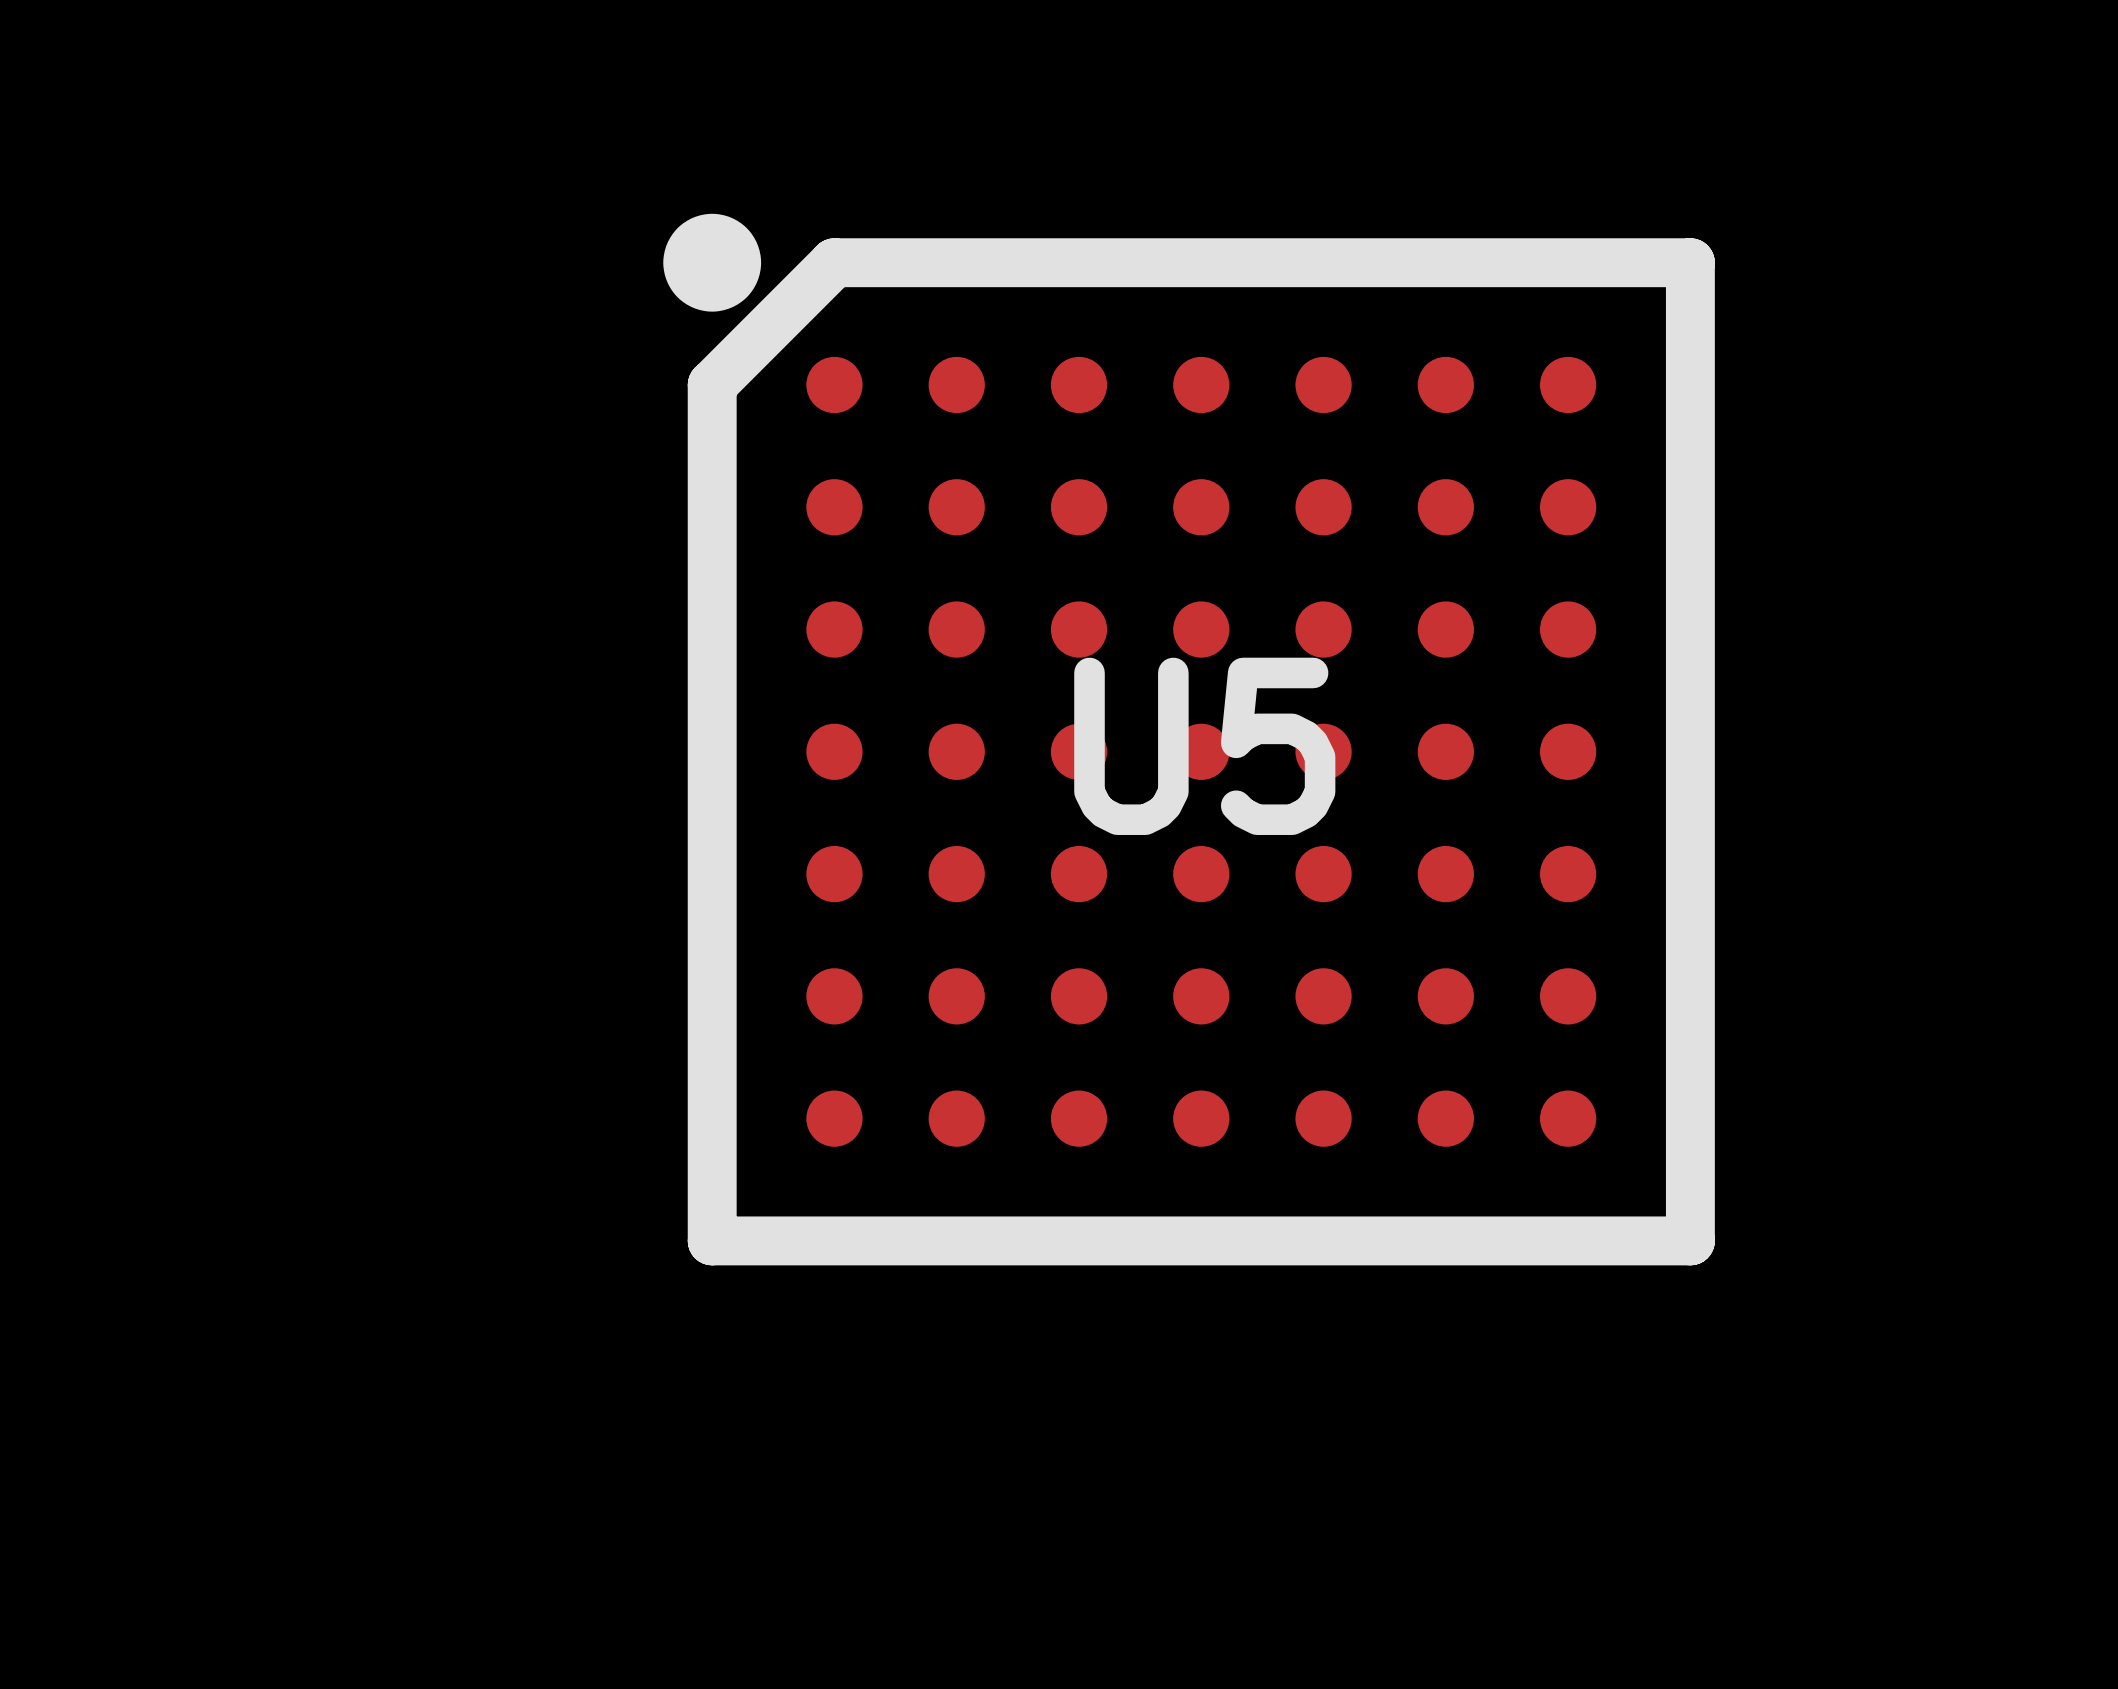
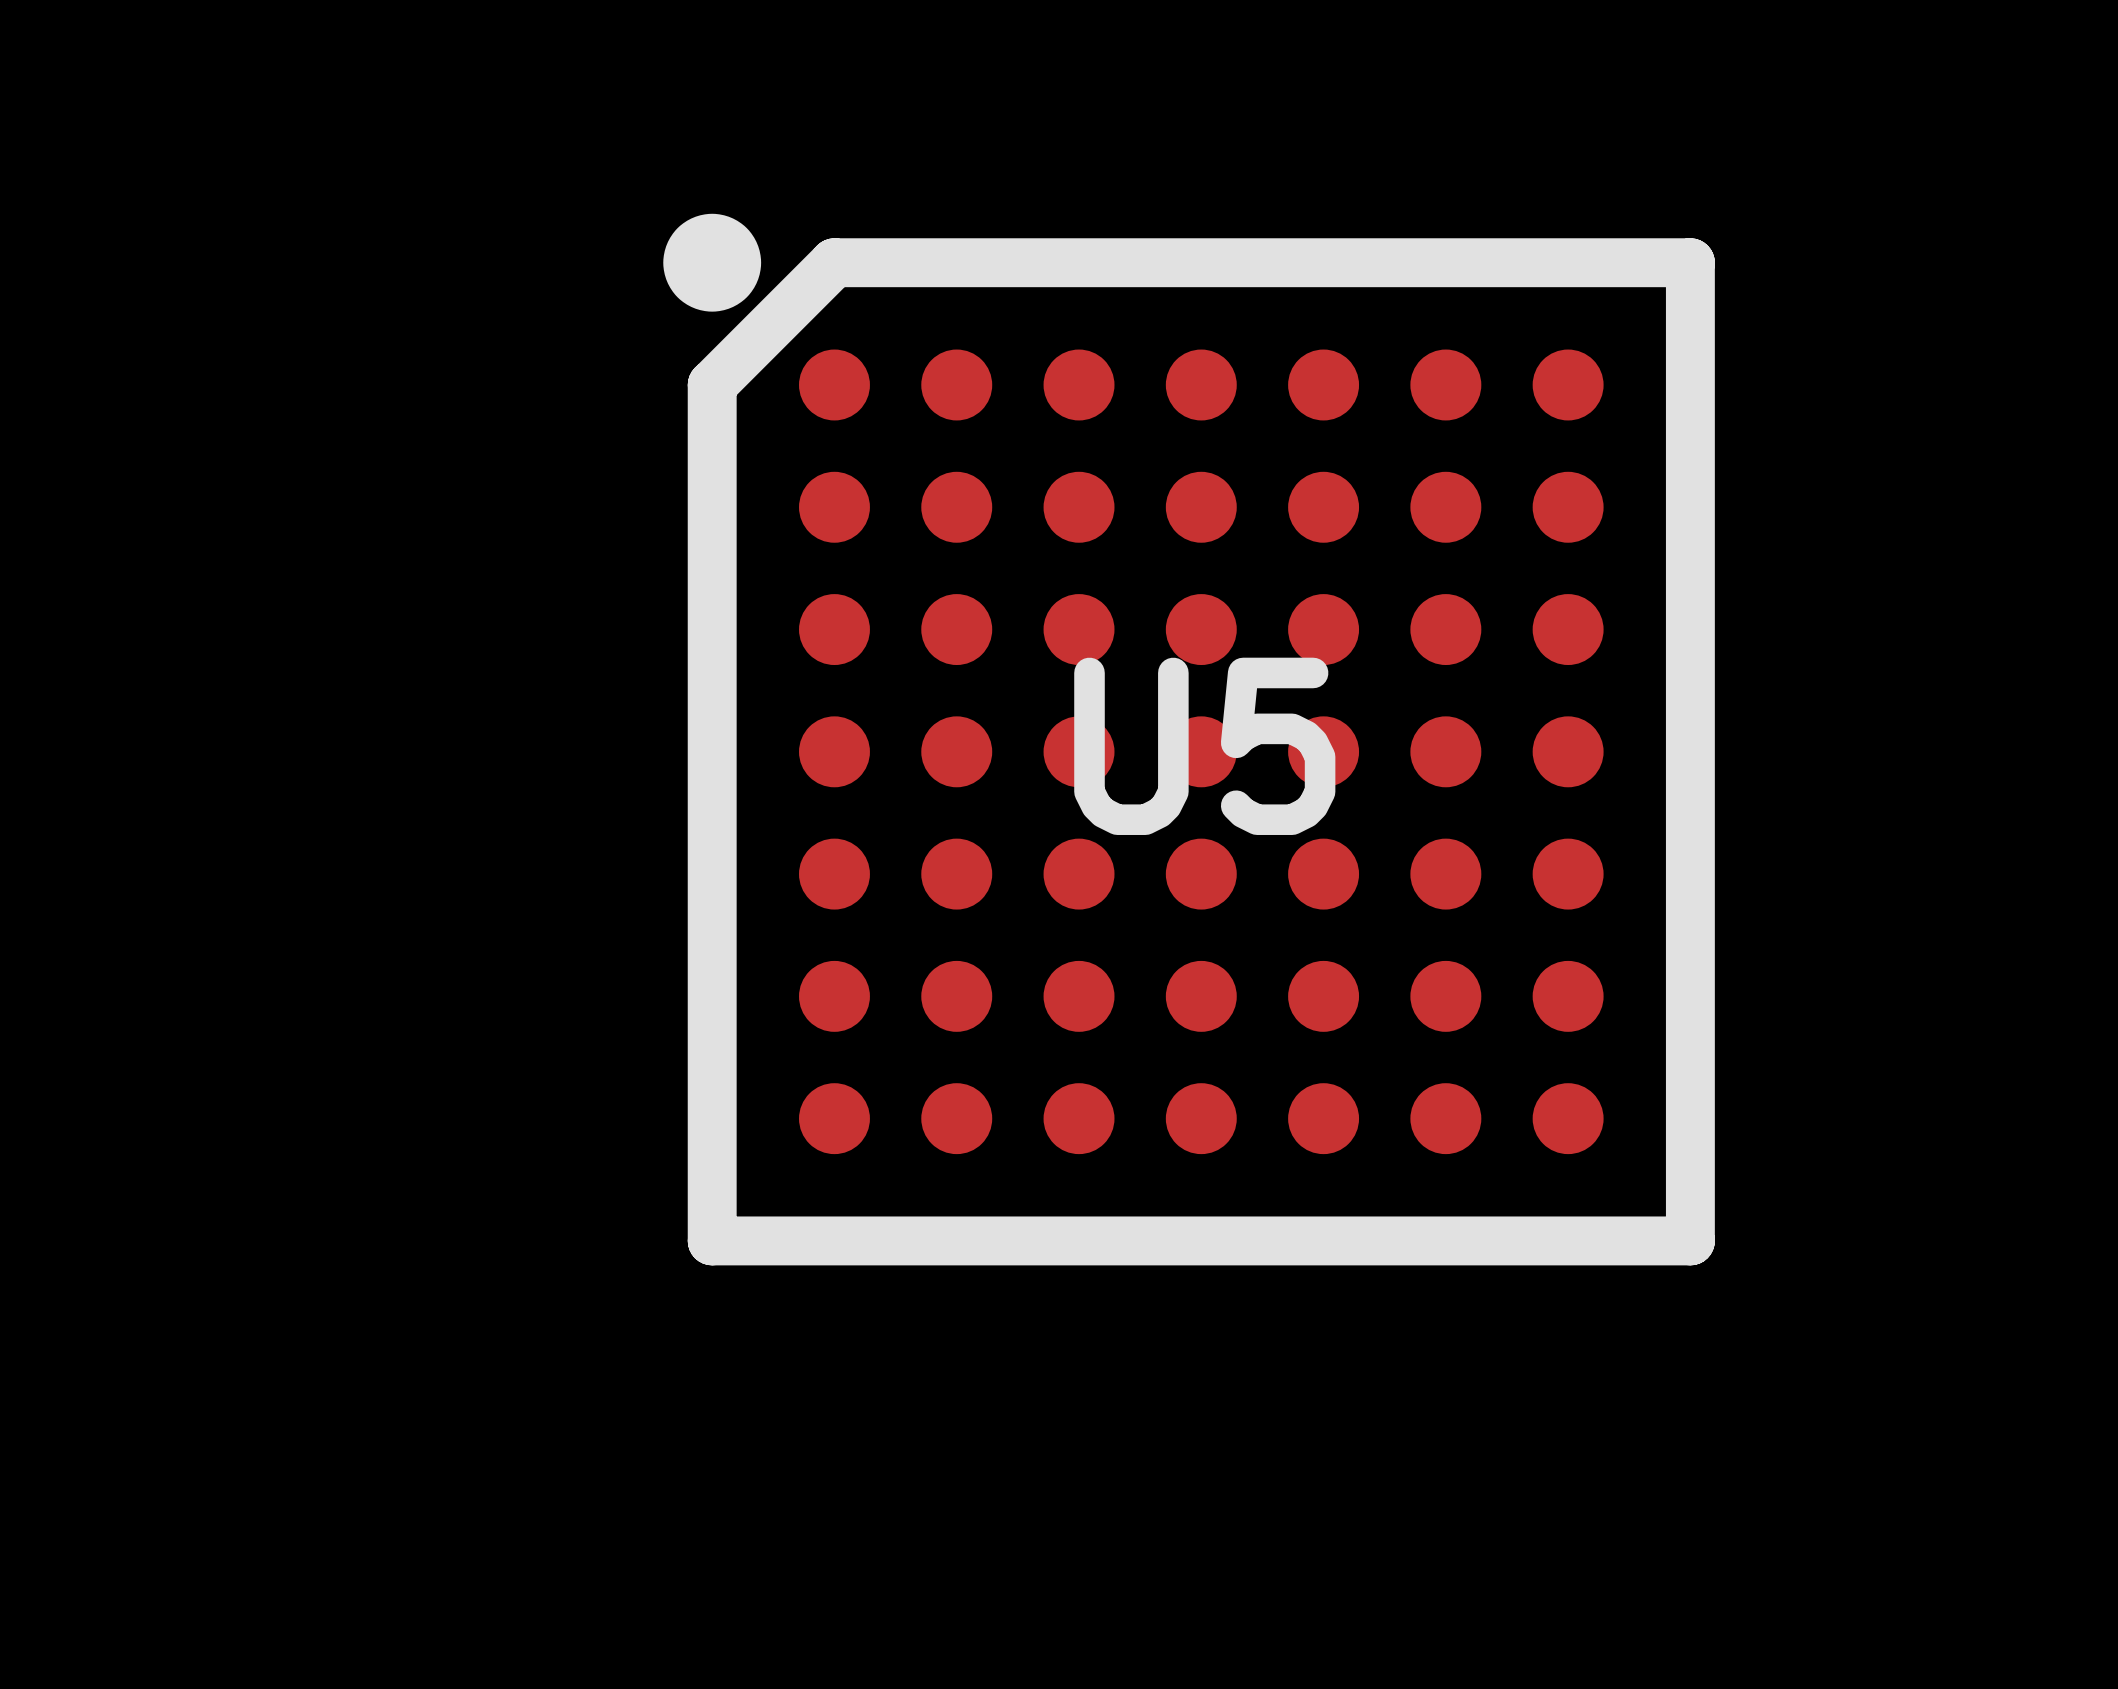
U5 footprint: [663, 213, 1715, 1266] -> [663, 213, 1715, 1266]

